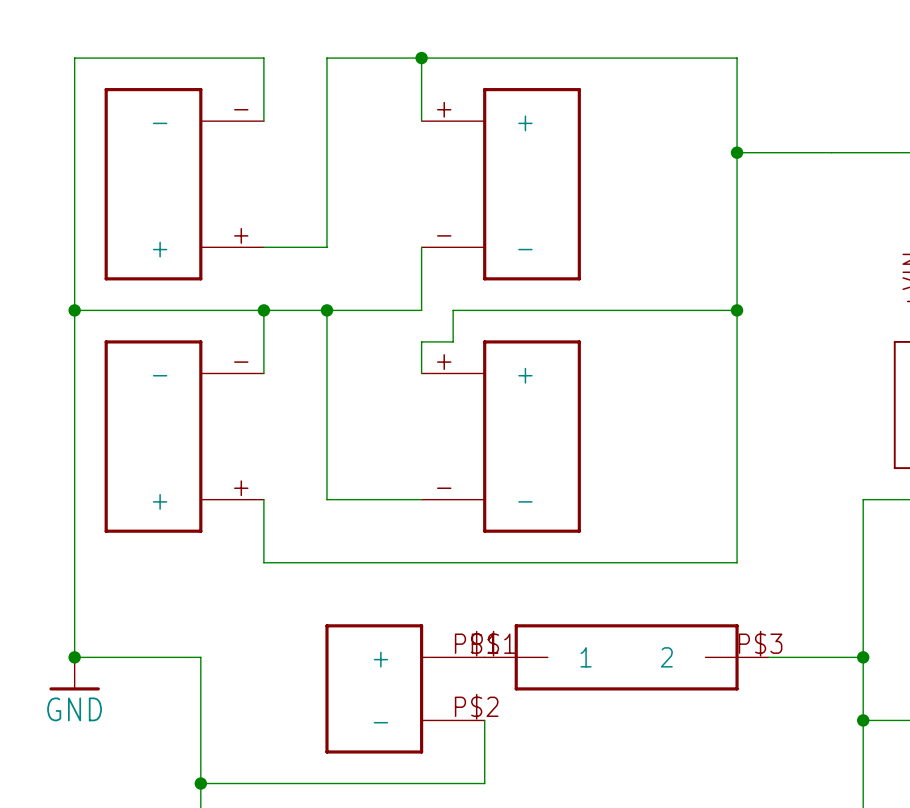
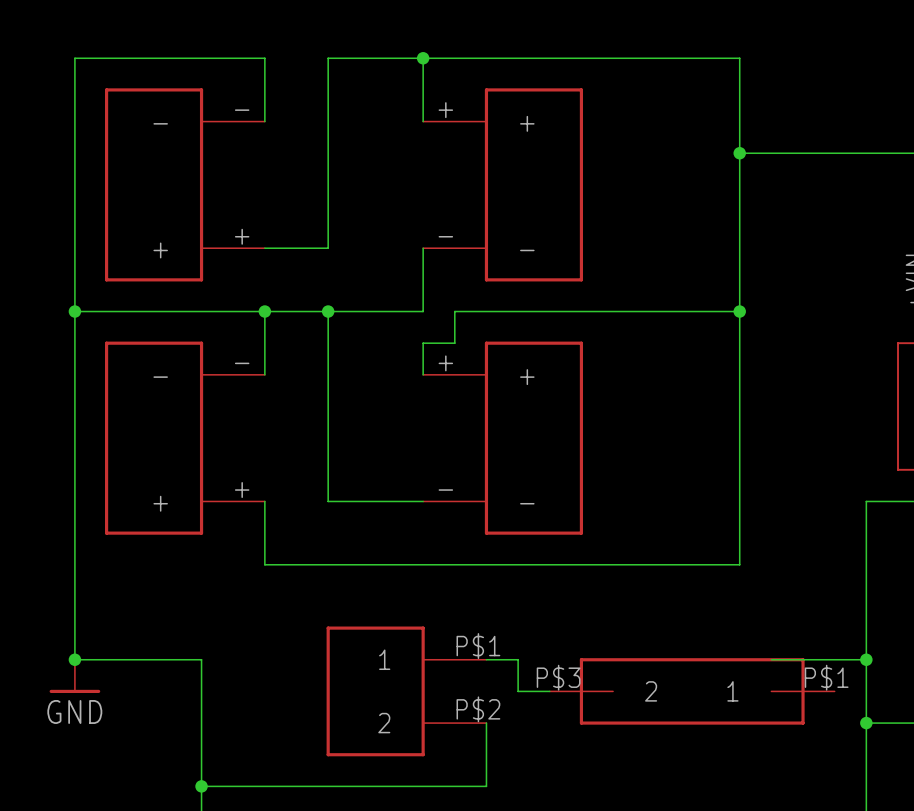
part rotation: 0° (626, 657) -> 180° (692, 691)
part pin name: + (380, 659) -> 1 (384, 659)
part pin name: - (380, 722) -> 2 (384, 723)

